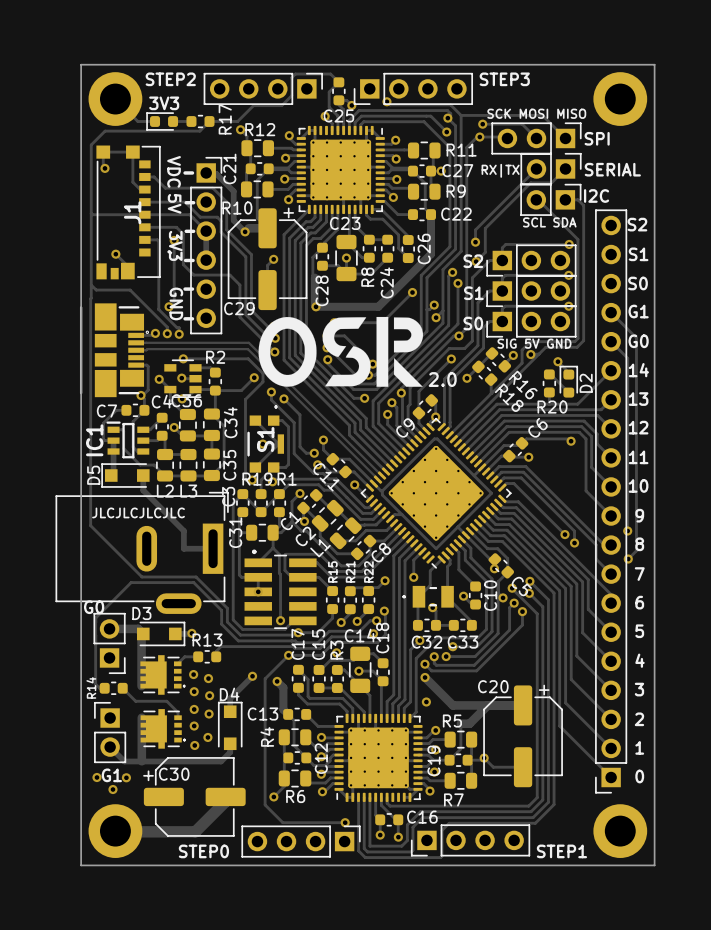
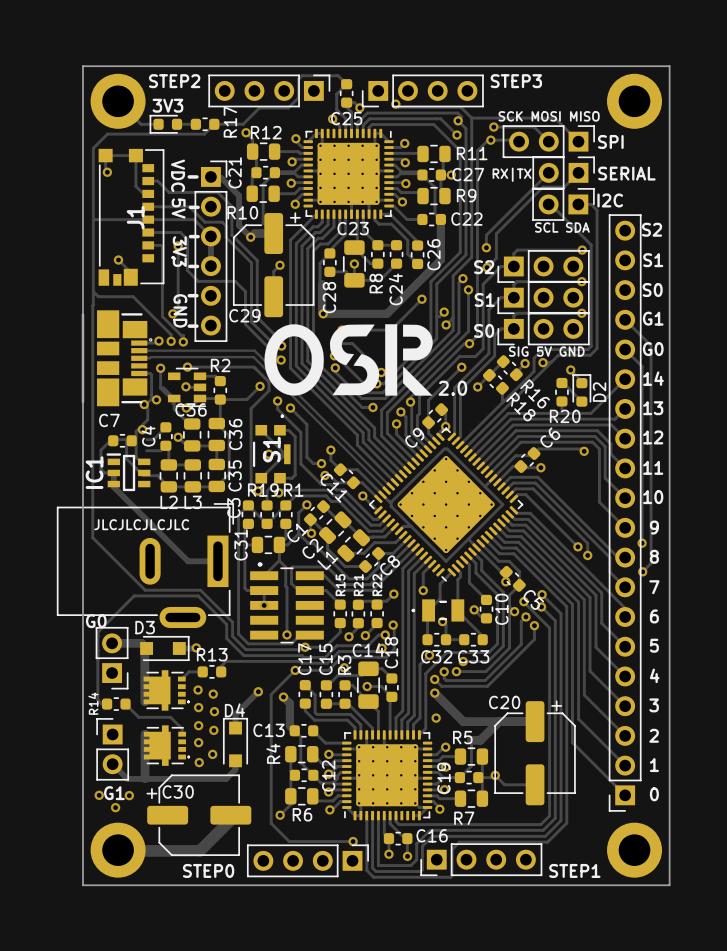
track: none -> (160, 368) (160, 388) (174, 402) (172, 403)
via: none -> (160, 368)
via: (159, 379) -> none
via: none -> (156, 399)
C4 name rotation: 0° (161, 401) -> 90° counterclockwise (148, 436)
C4 name position: C4 (161, 401) -> C4 (148, 436)
track: (126, 410) (116, 410) (103, 423) (103, 439) (113, 440) (113, 473) (111, 475) -> none
C7 position: (135, 410) -> (122, 440)
via: none -> (142, 429)
C34 name: C34 (230, 422) -> C36 (235, 434)
IC1 position: (127, 439) -> (128, 472)
D5: (125, 475) -> none
track: (143, 475) (143, 490) (183, 531) (183, 548) -> (113, 440) (110, 440) (100, 450) (100, 469) (104, 472) (113, 472) (113, 487) (188, 561)

